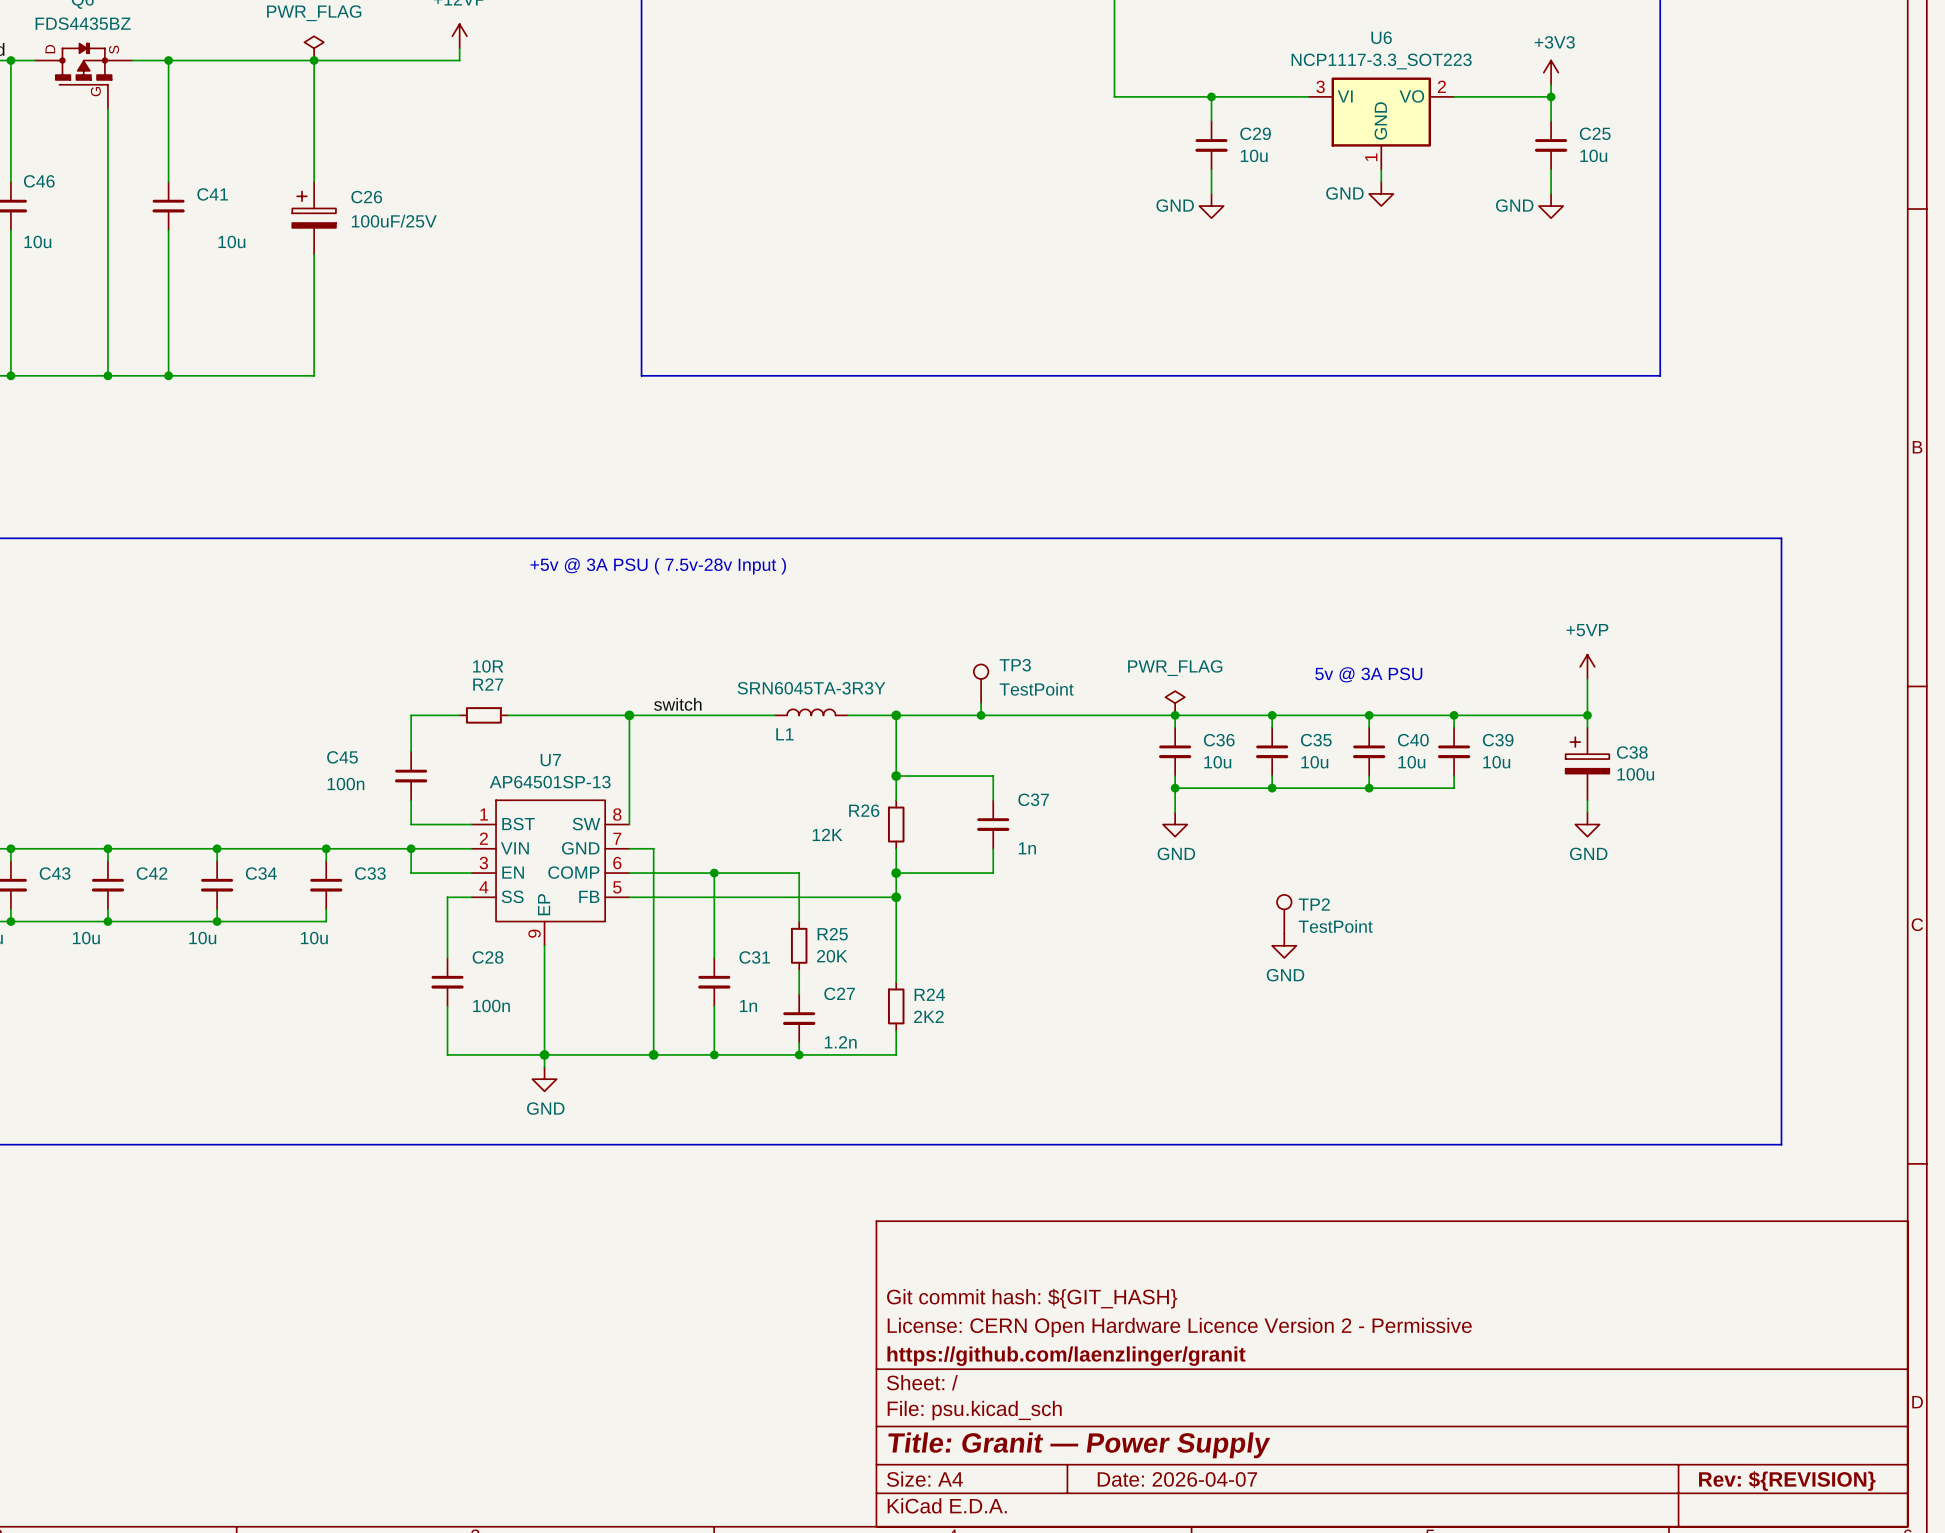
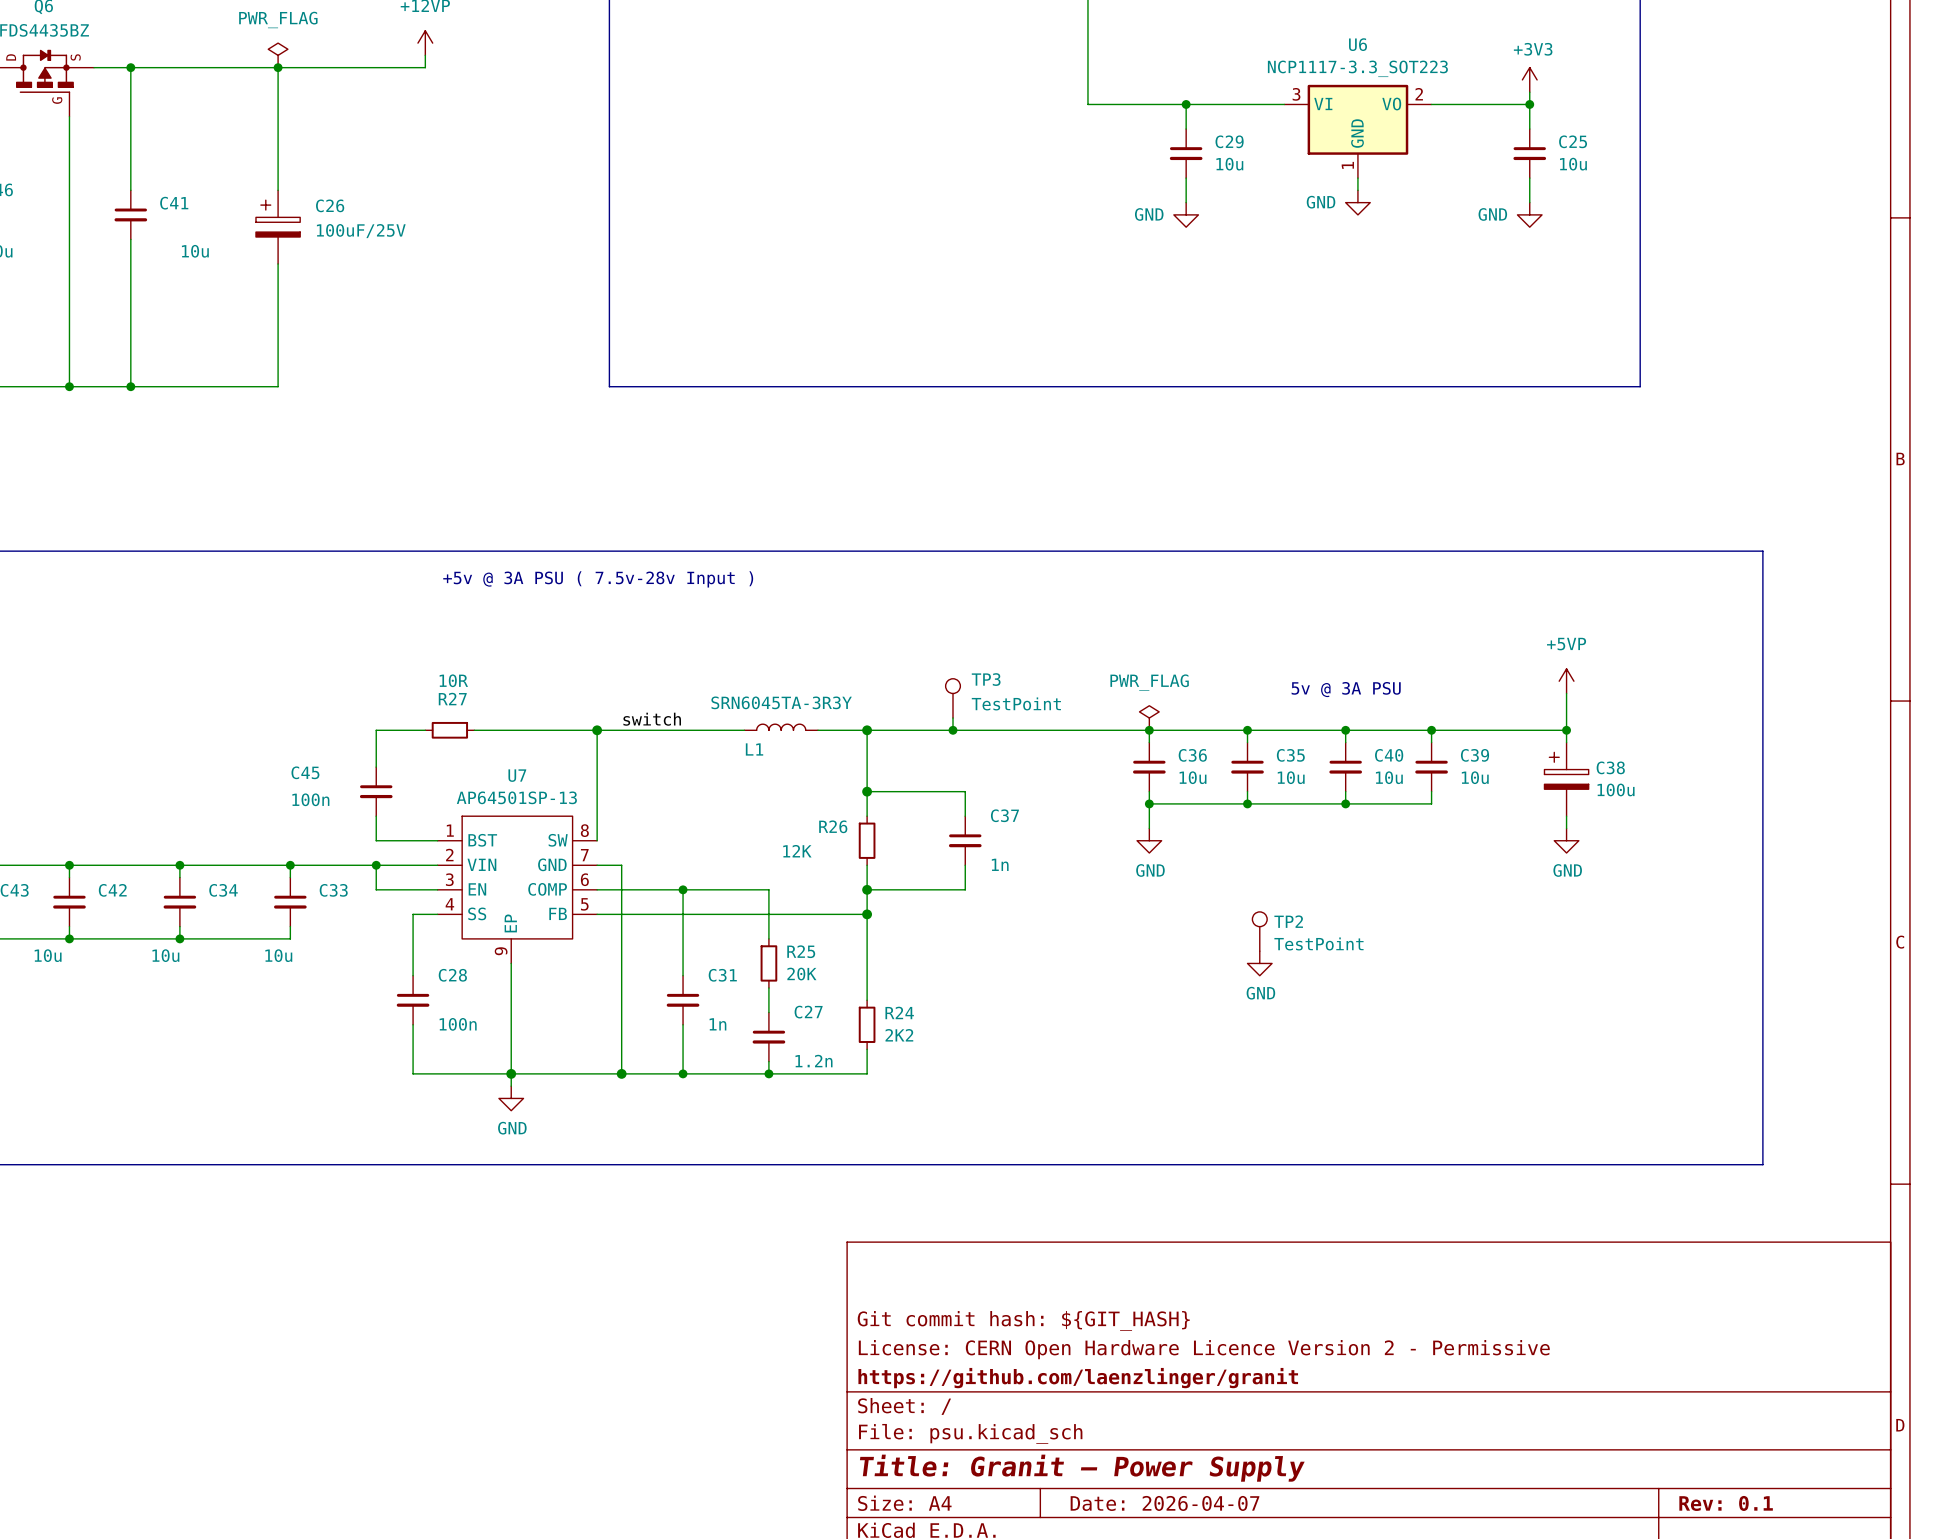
title block: Rev: ${REVISION} (1787, 1481) -> Rev: 0.1 (1726, 1503)

